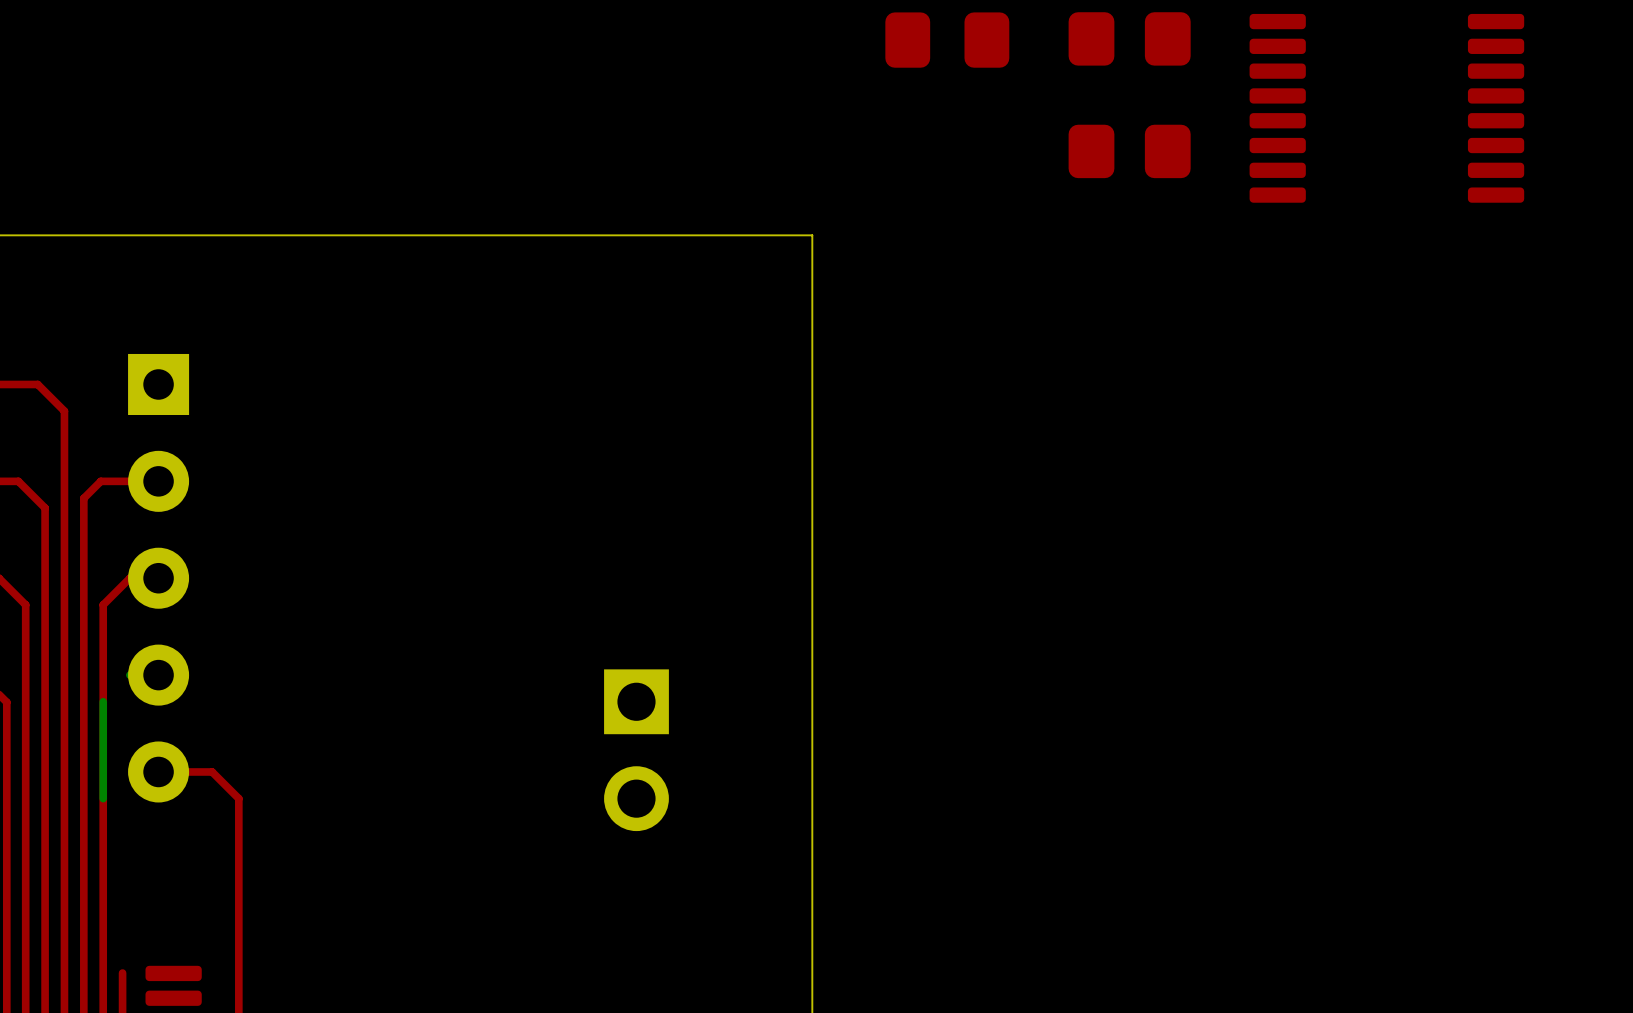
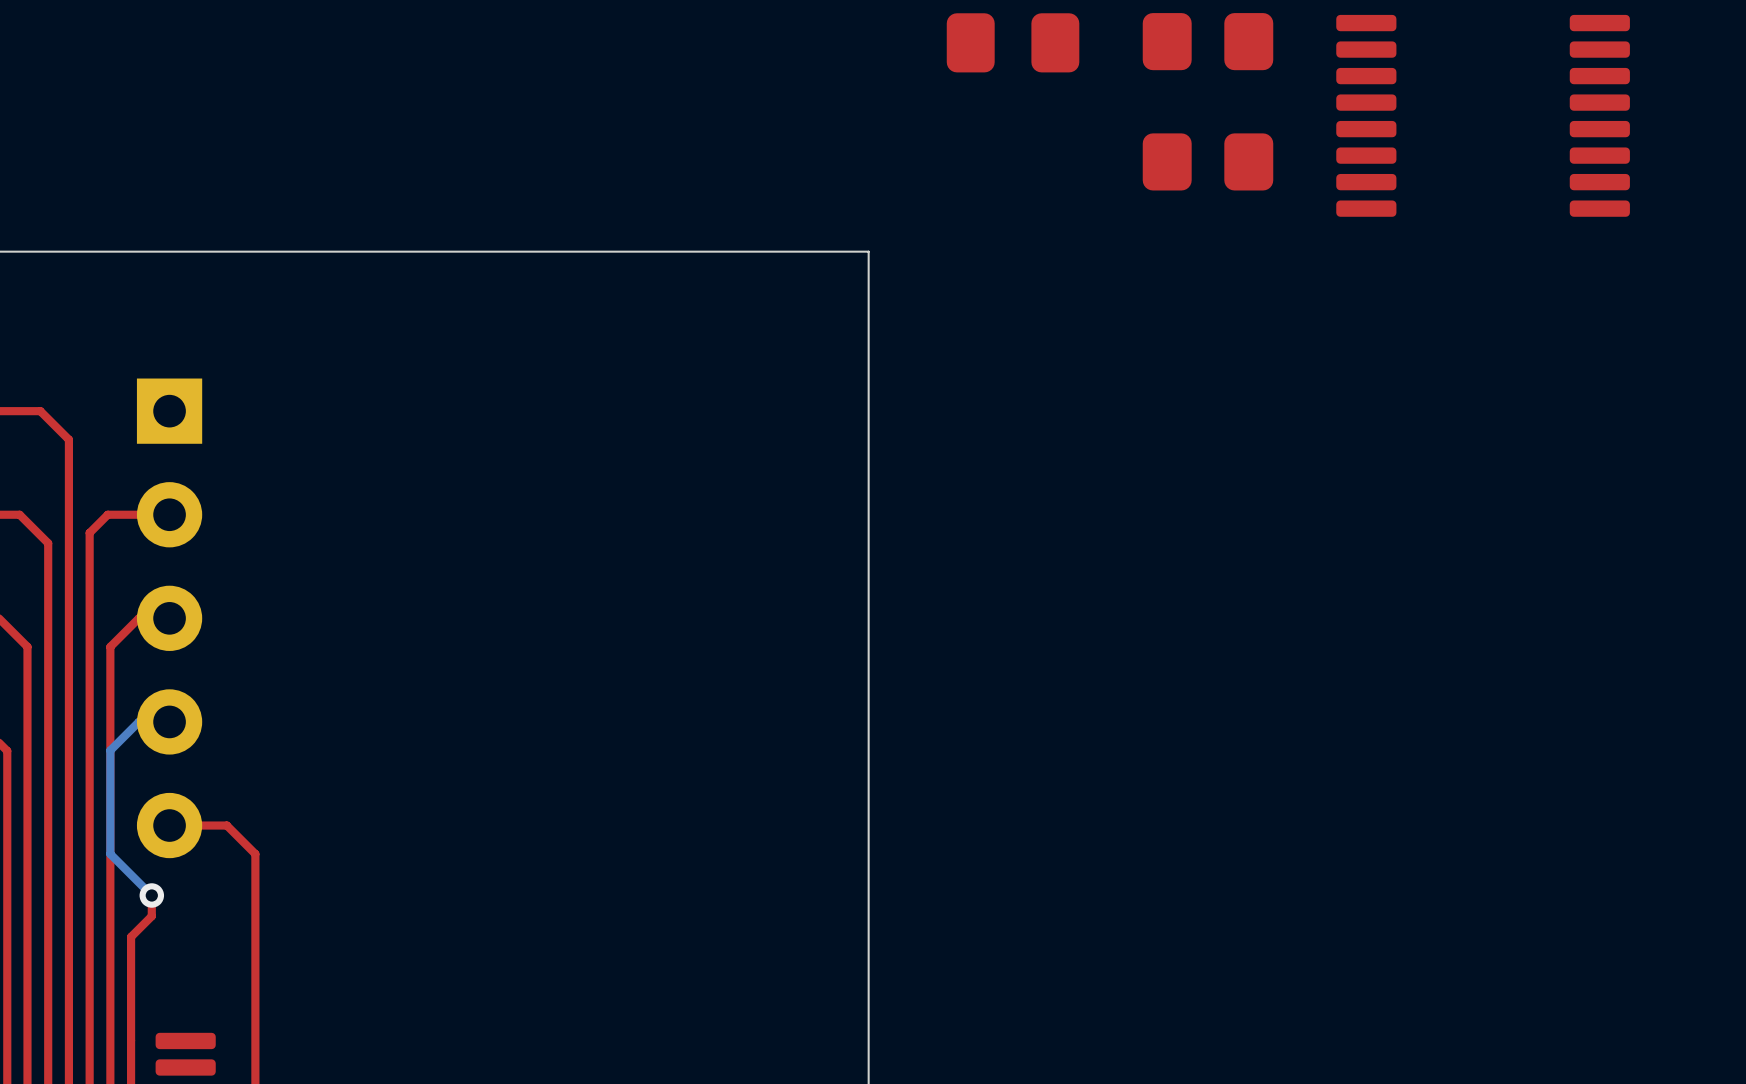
bottom track: none -> (138, 721) (110, 750)
part: (636, 750) -> none
bottom track: none -> (110, 854) (151, 895)
top track: none -> (151, 895) (151, 916) (131, 936) (131, 1040)
via: none -> (151, 895)

